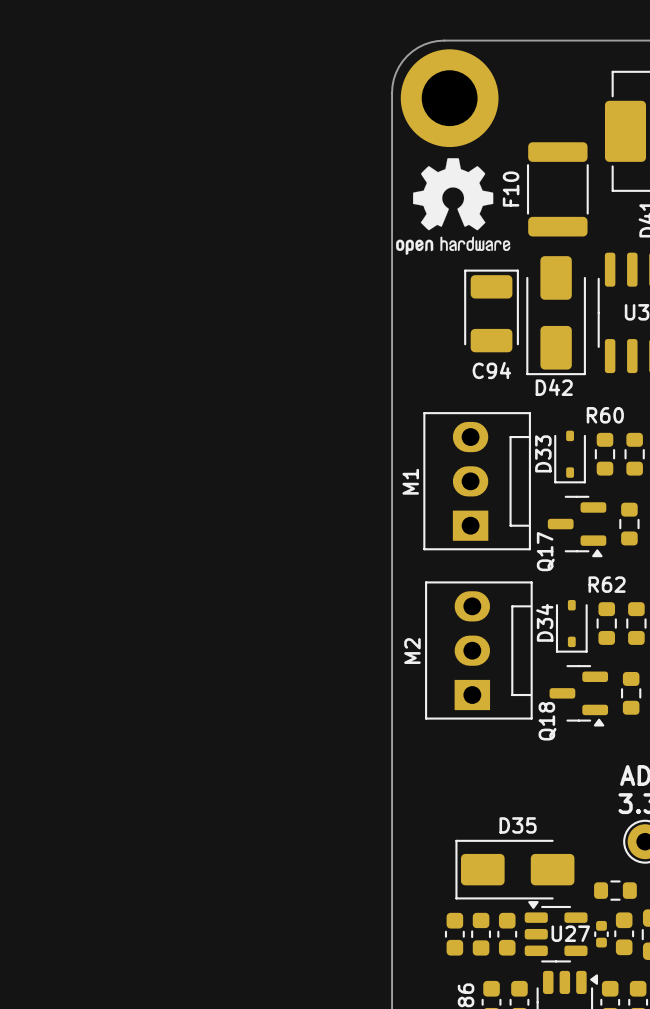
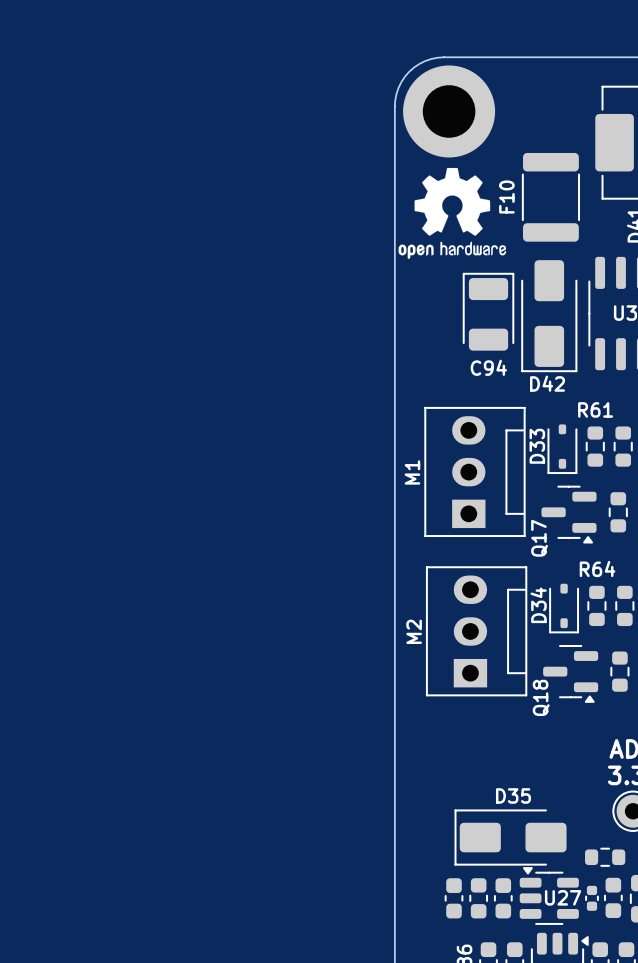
R60 name: R60 (605, 415) -> R61 (595, 409)
R62 name: R62 (607, 584) -> R64 (597, 568)

